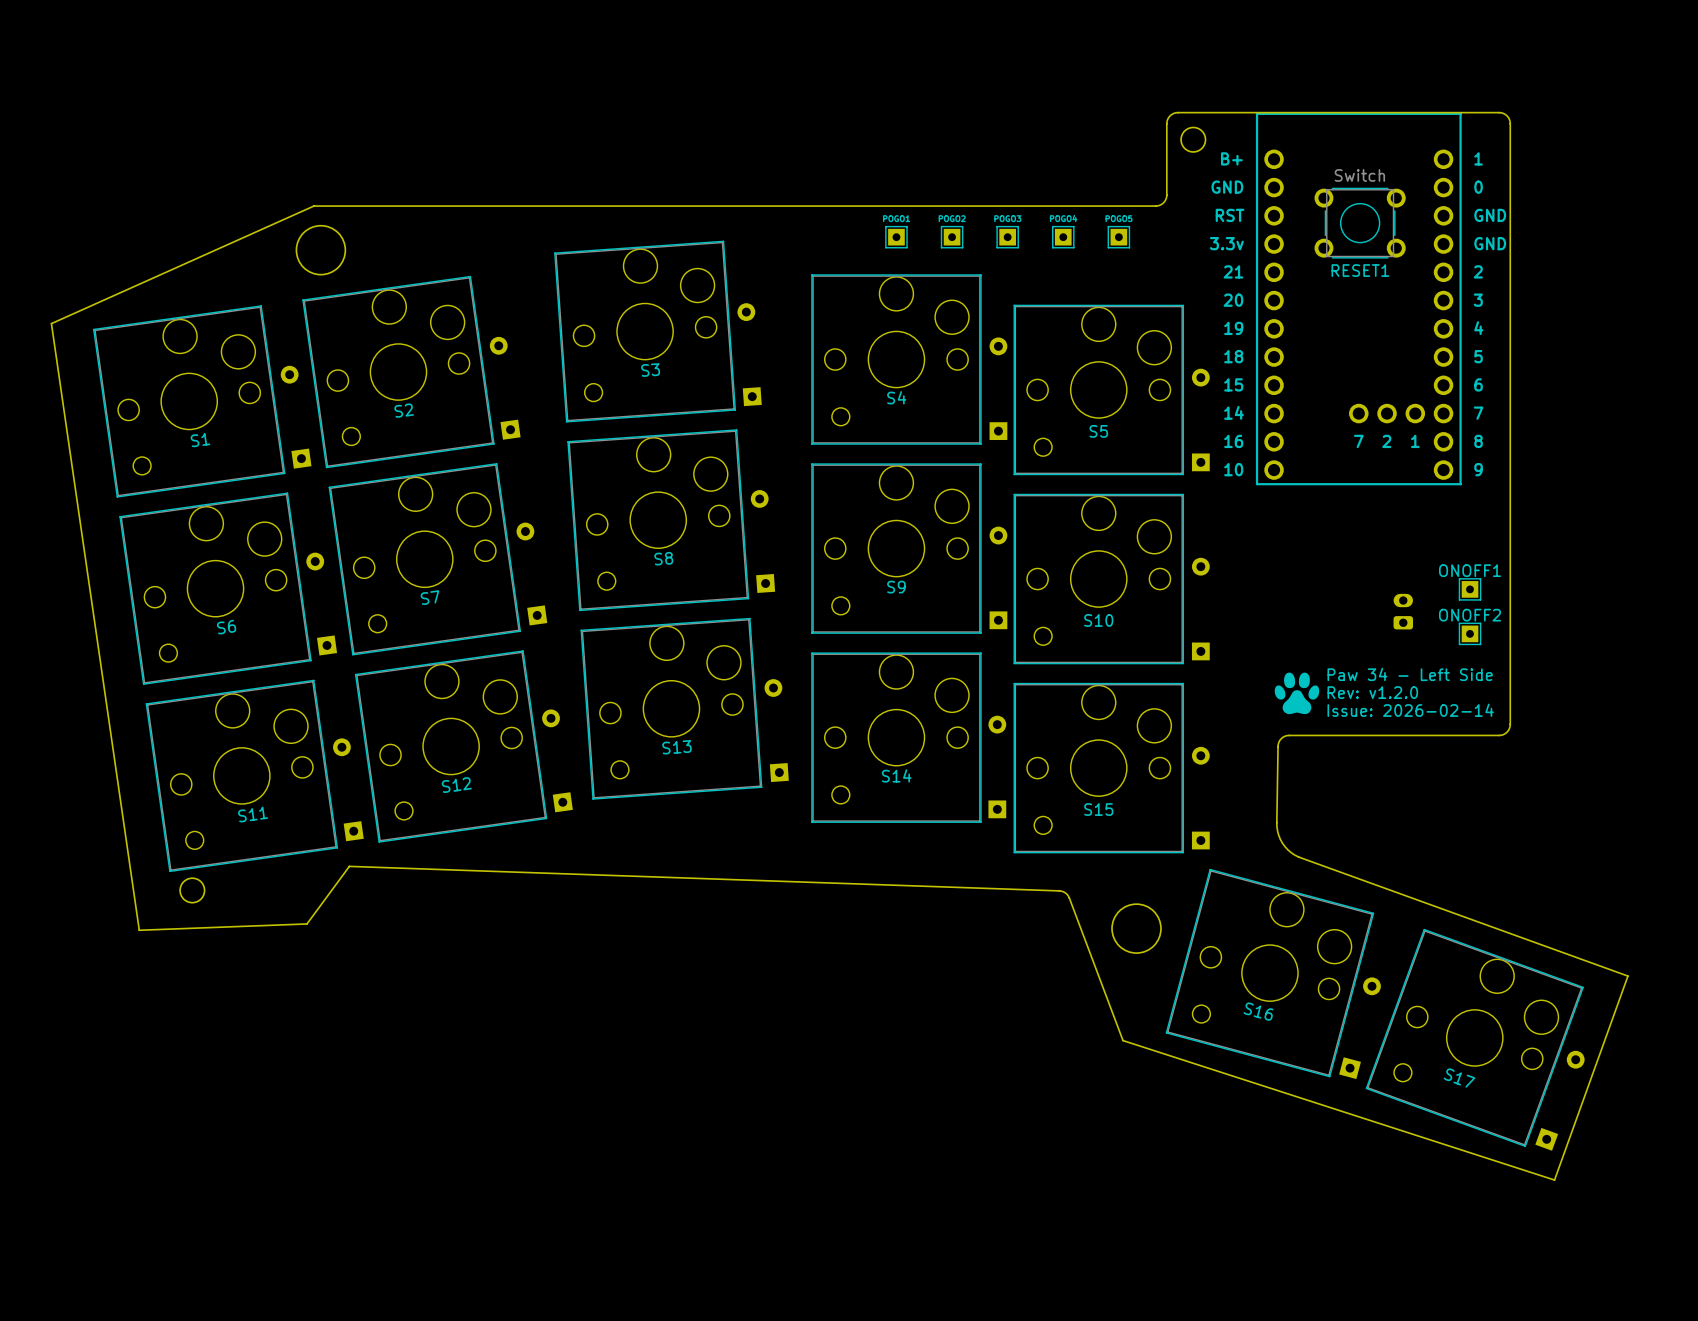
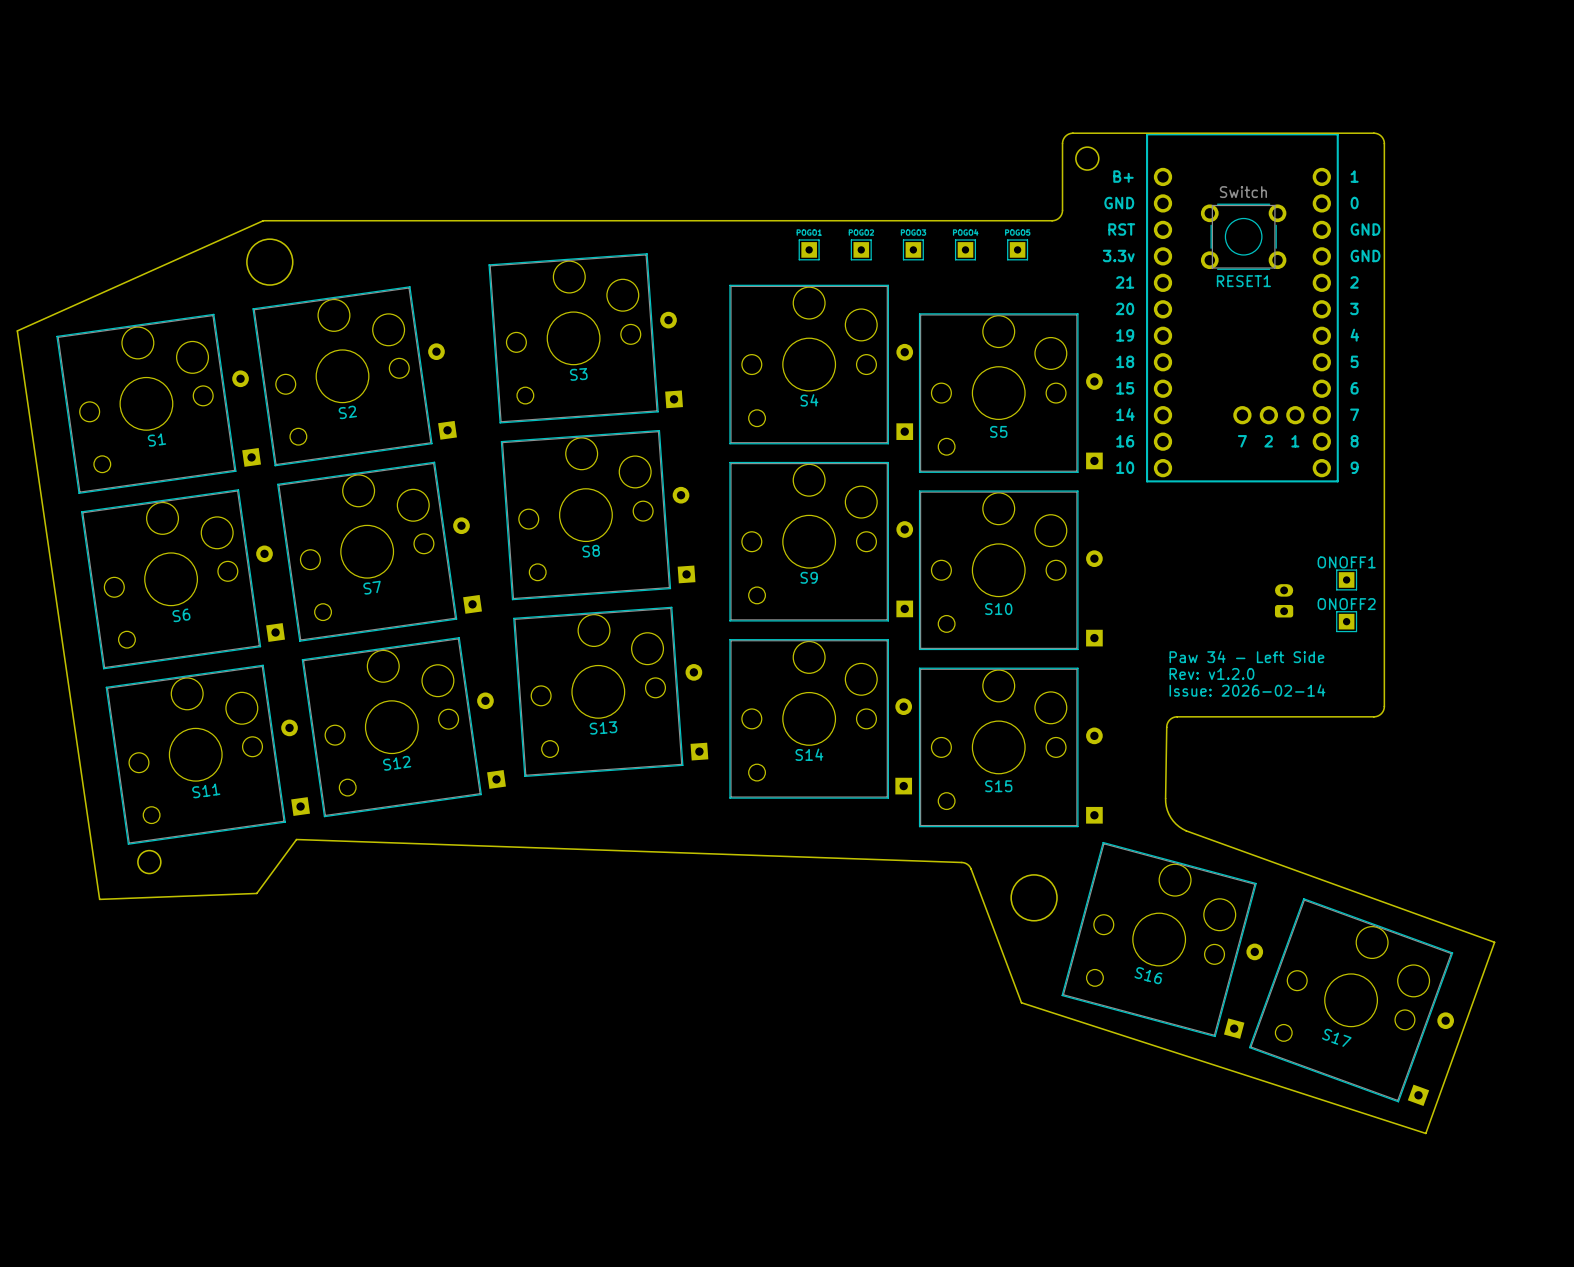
drawing: [1274, 672, 1320, 715] -> none
text position: Paw 34 - Left Side (1410, 674) -> Paw 34 - Left Side (1246, 656)
text position: Rev: v1.2.0 (1372, 692) -> Rev: v1.2.0 (1211, 673)
text position: Issue: 2026-02-14 (1410, 710) -> Issue: 2026-02-14 (1247, 690)

